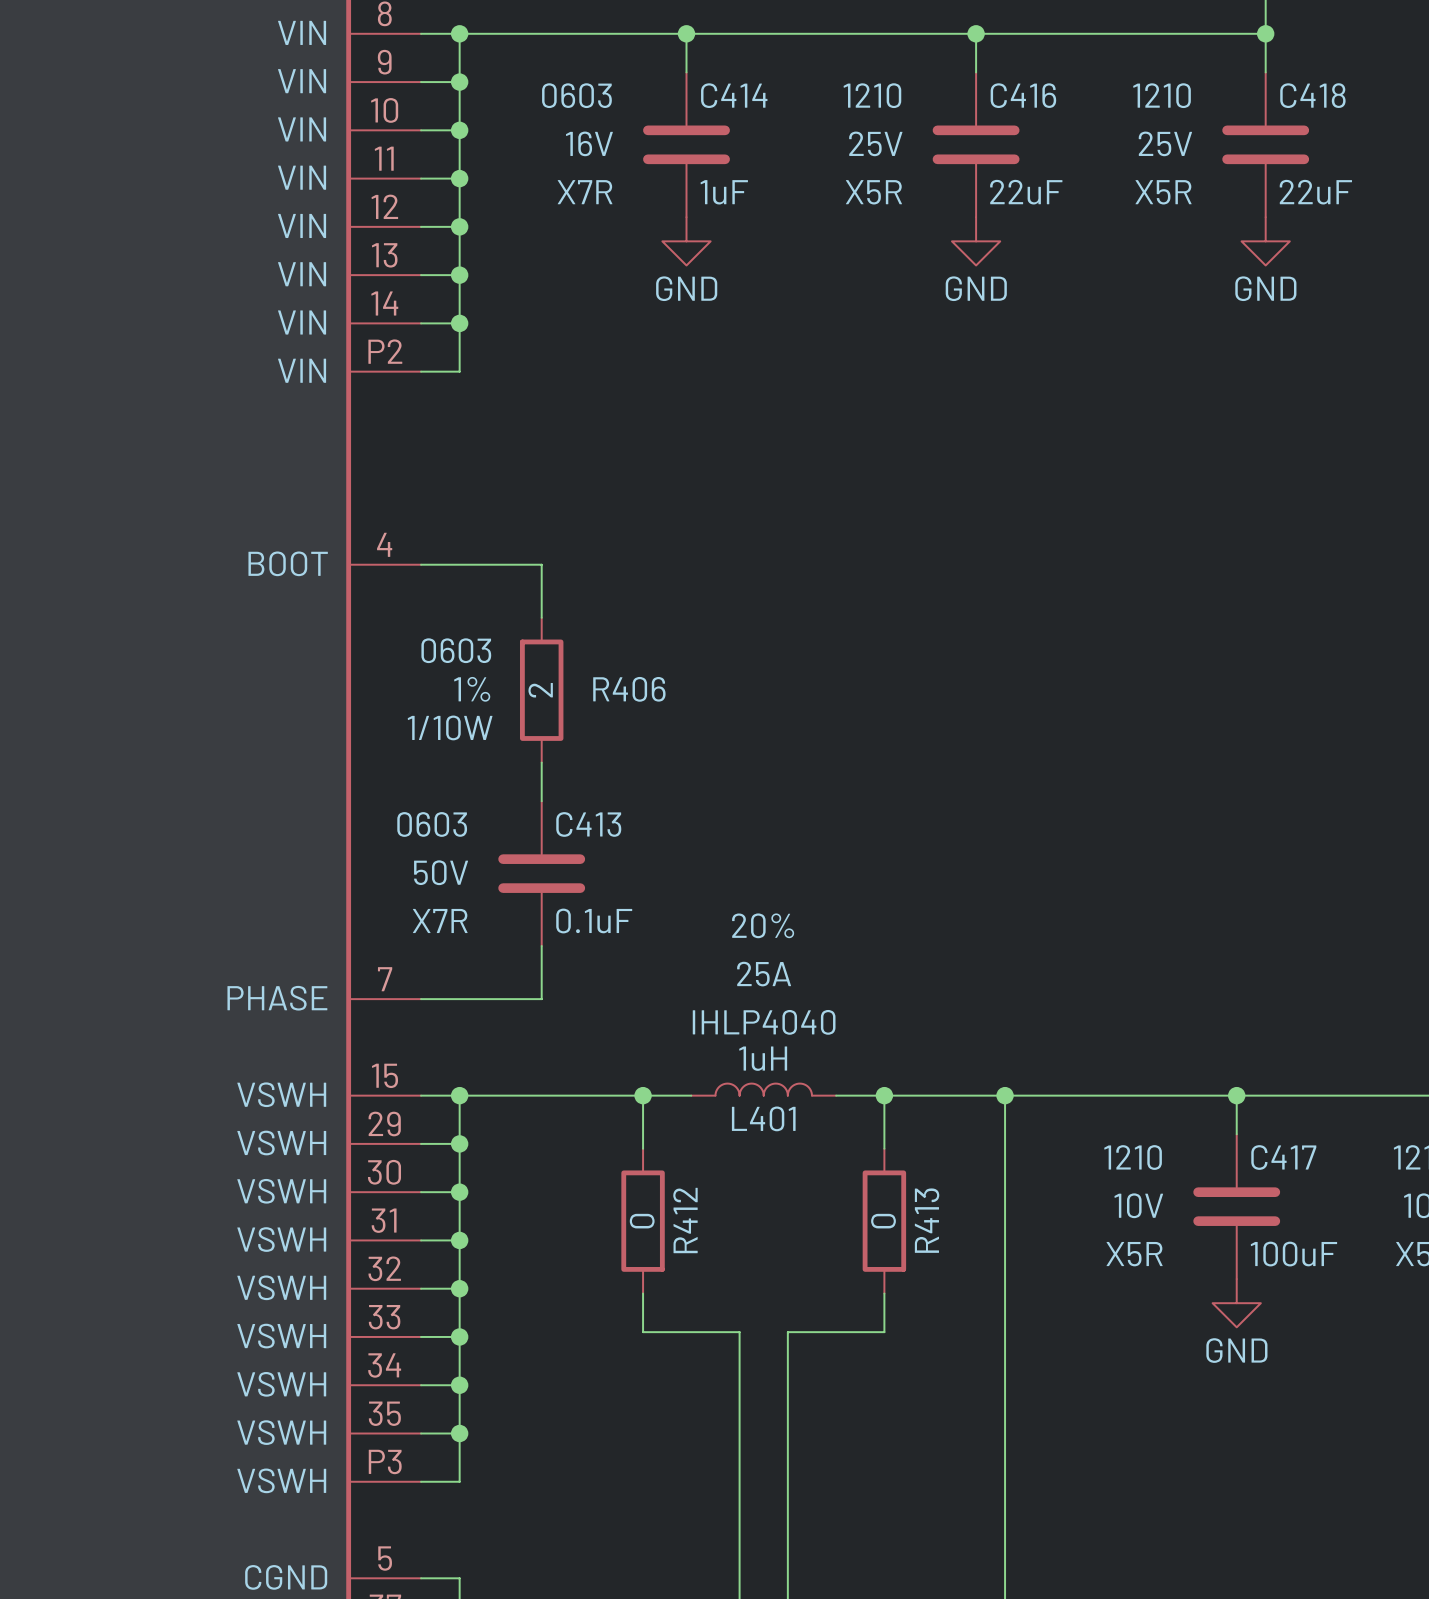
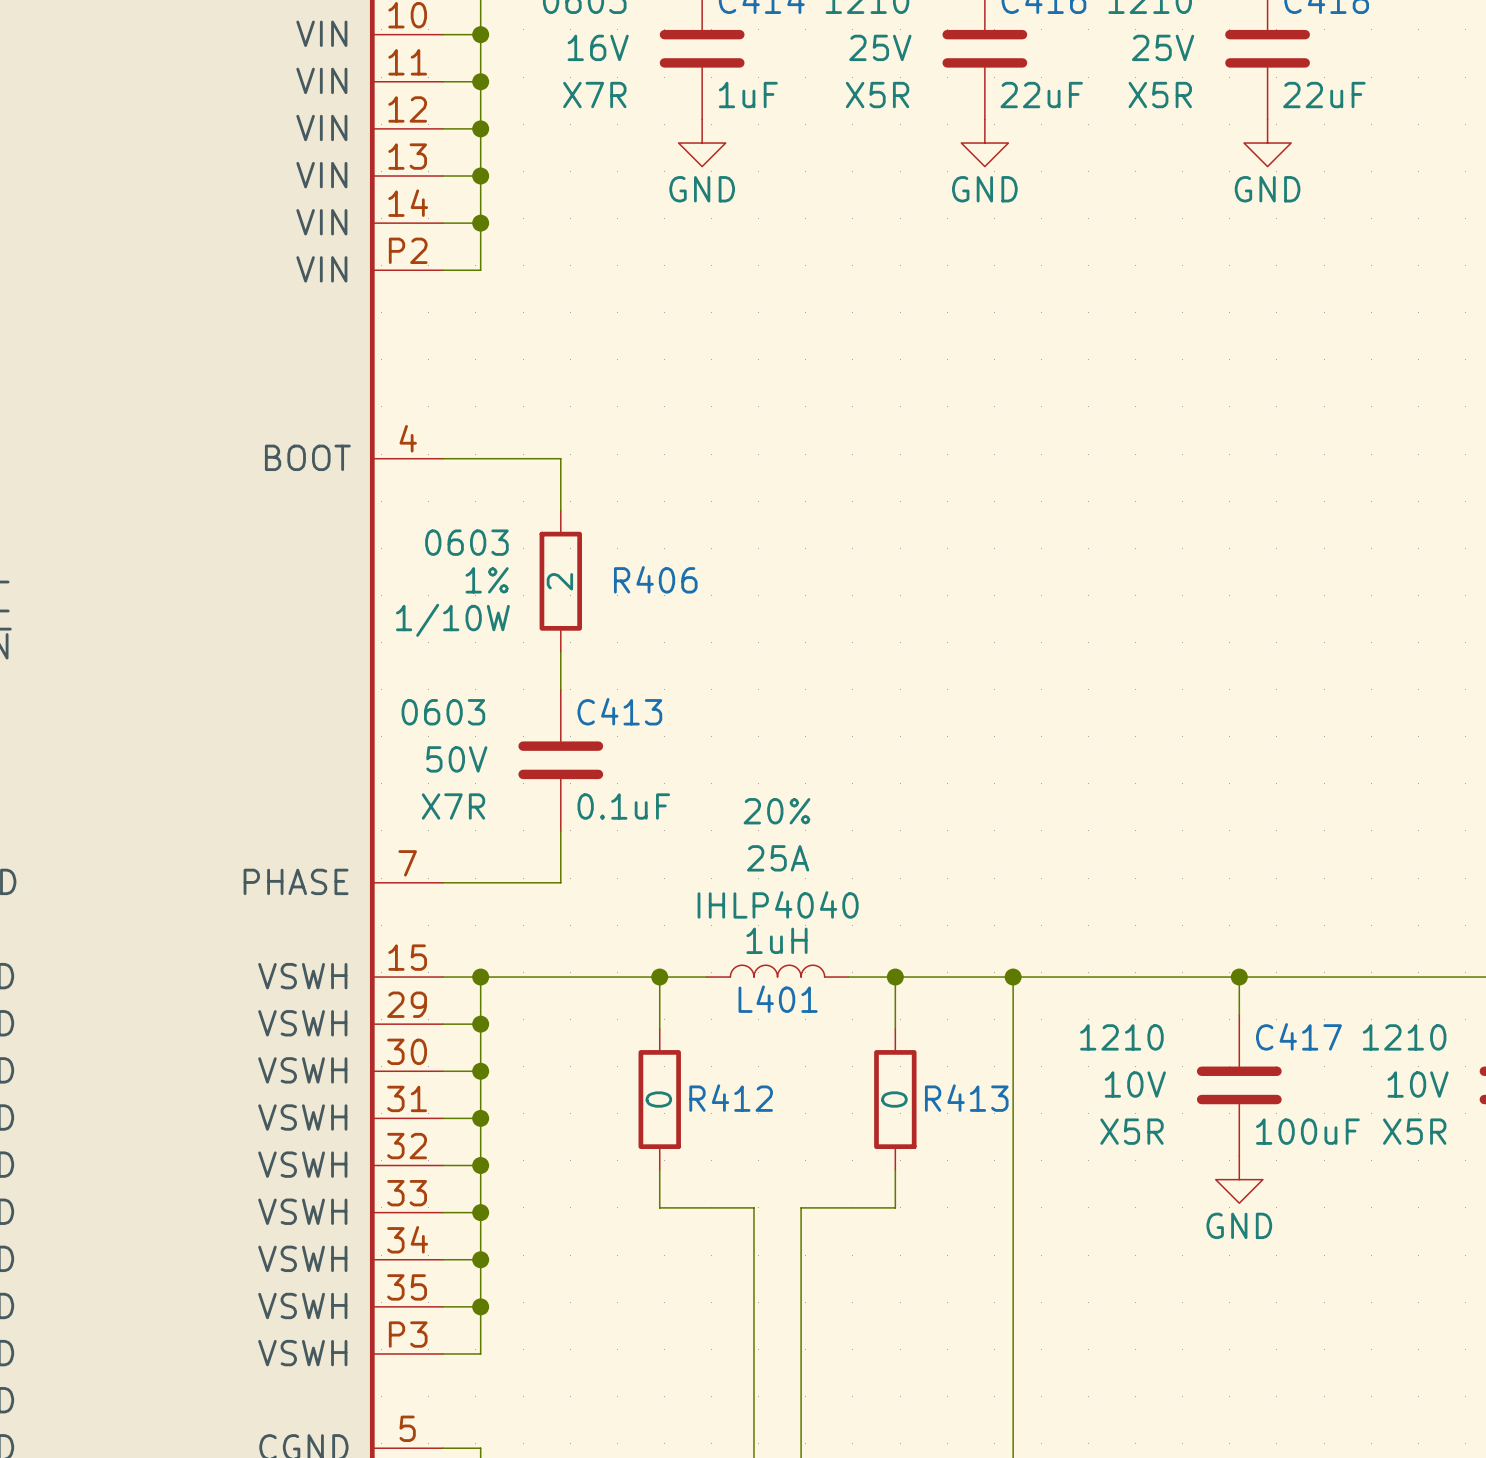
R412 name rotation: 0° (685, 1220) -> 90° clockwise (731, 1098)
R413 name rotation: 0° (927, 1220) -> 90° clockwise (966, 1098)

